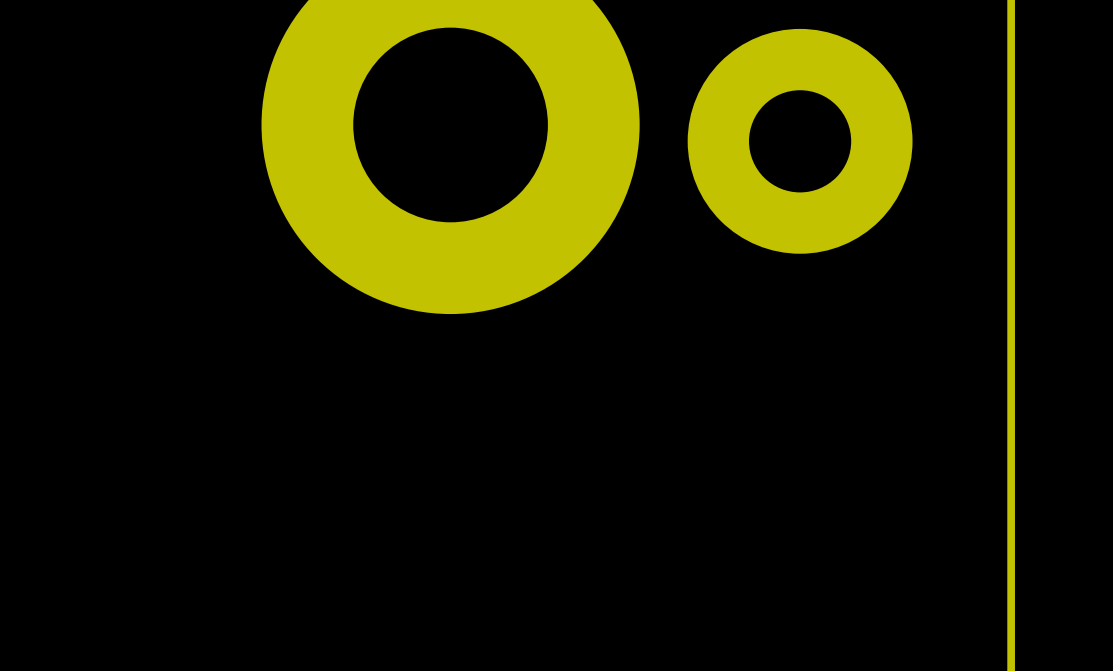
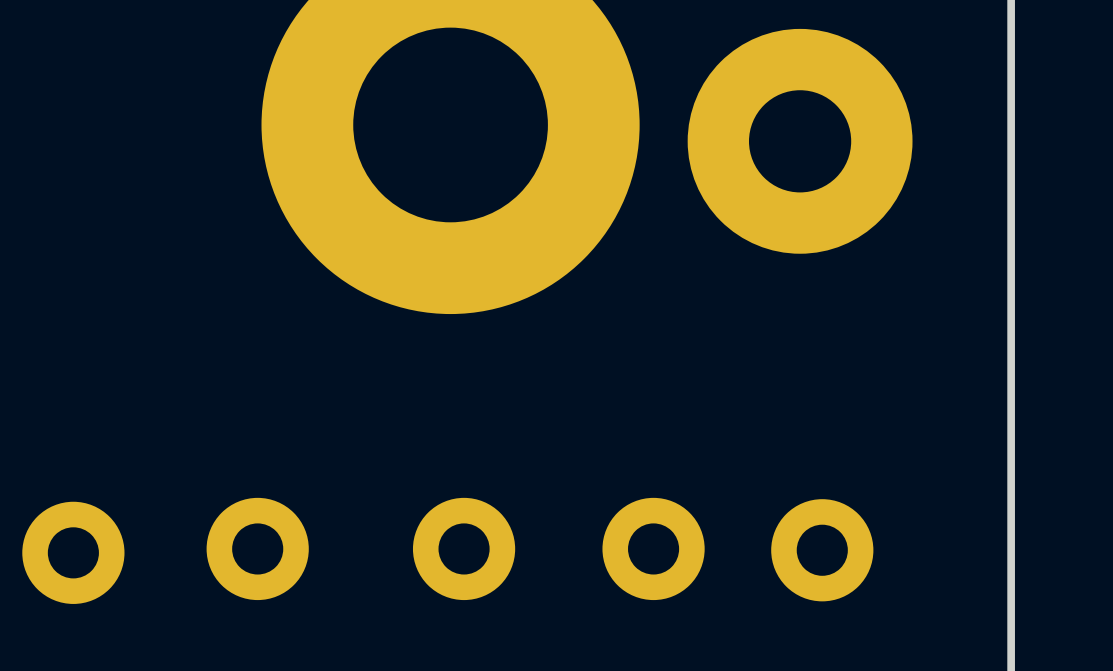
part: none -> (257, 548)
part: none -> (464, 548)
part: none -> (653, 548)
part: none -> (822, 550)
part: none -> (73, 552)

